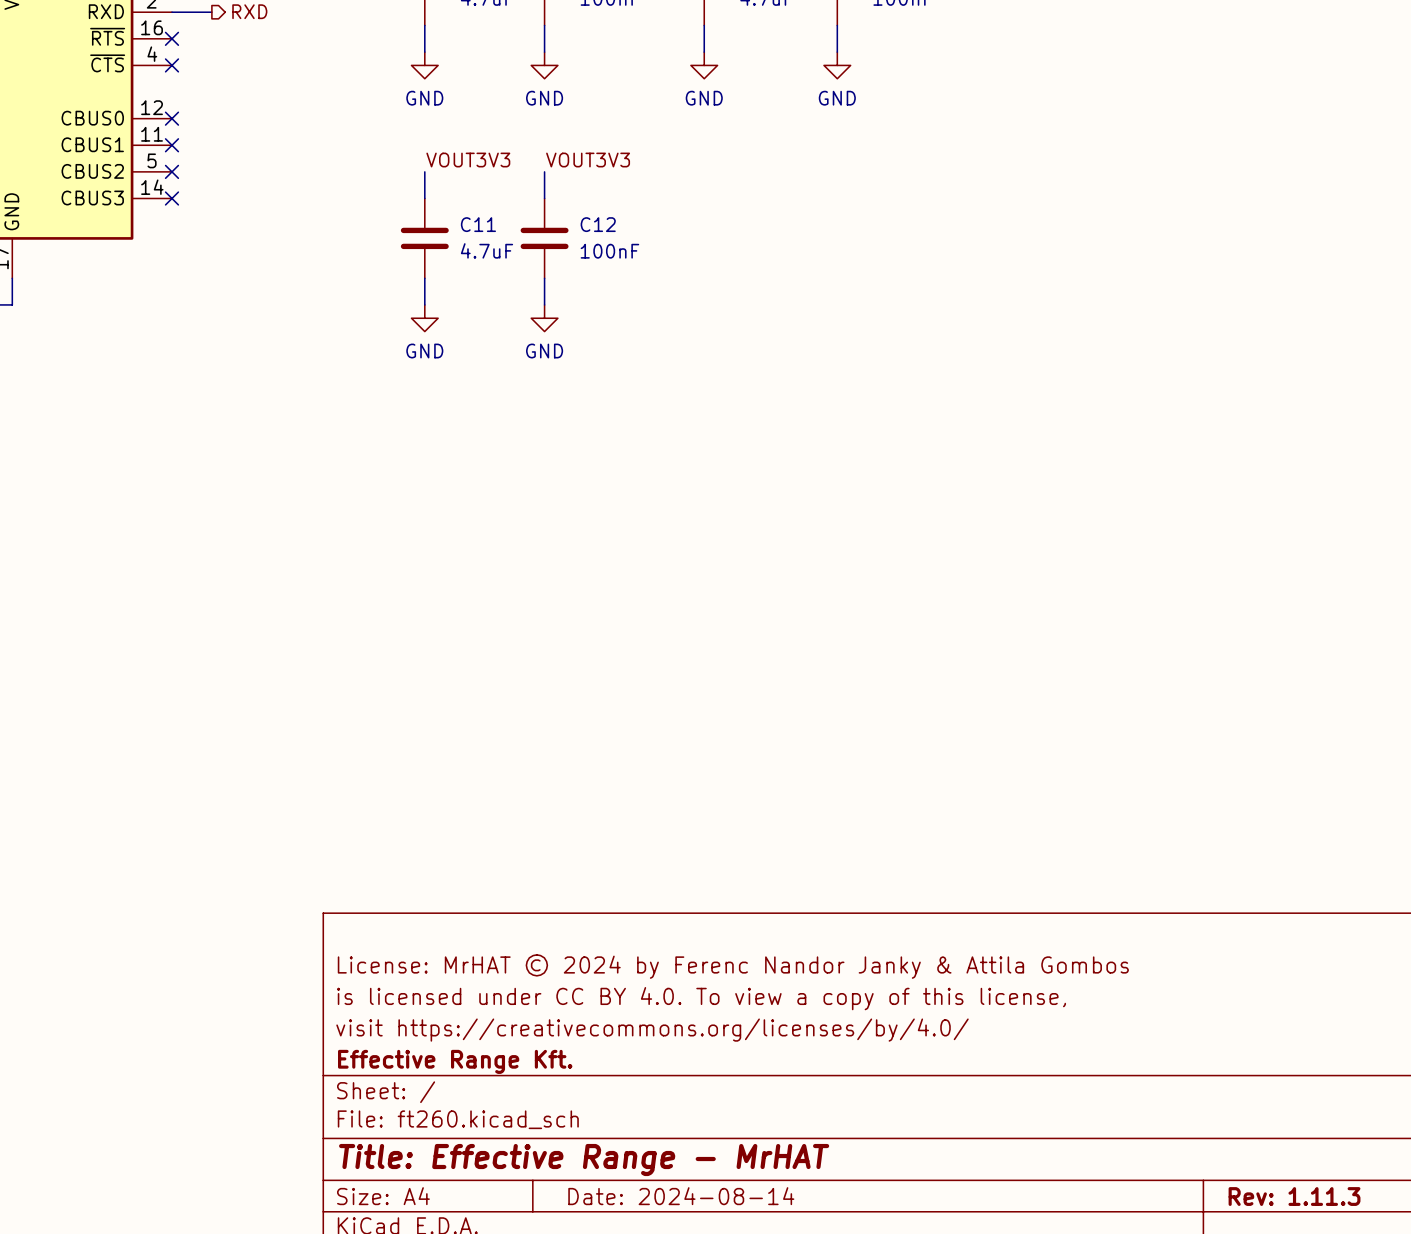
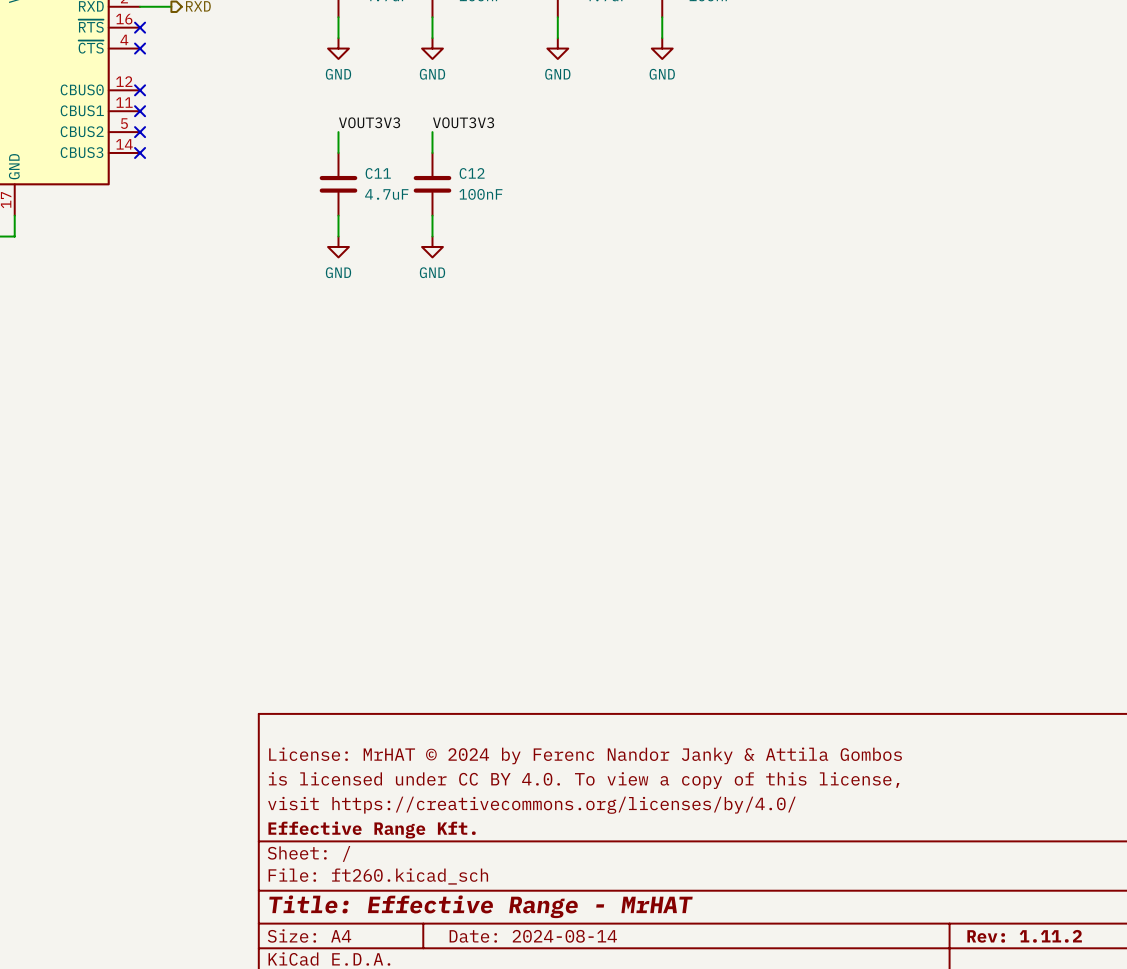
title block: Rev: 1.11.3 (1294, 1196) -> Rev: 1.11.2 (1024, 936)

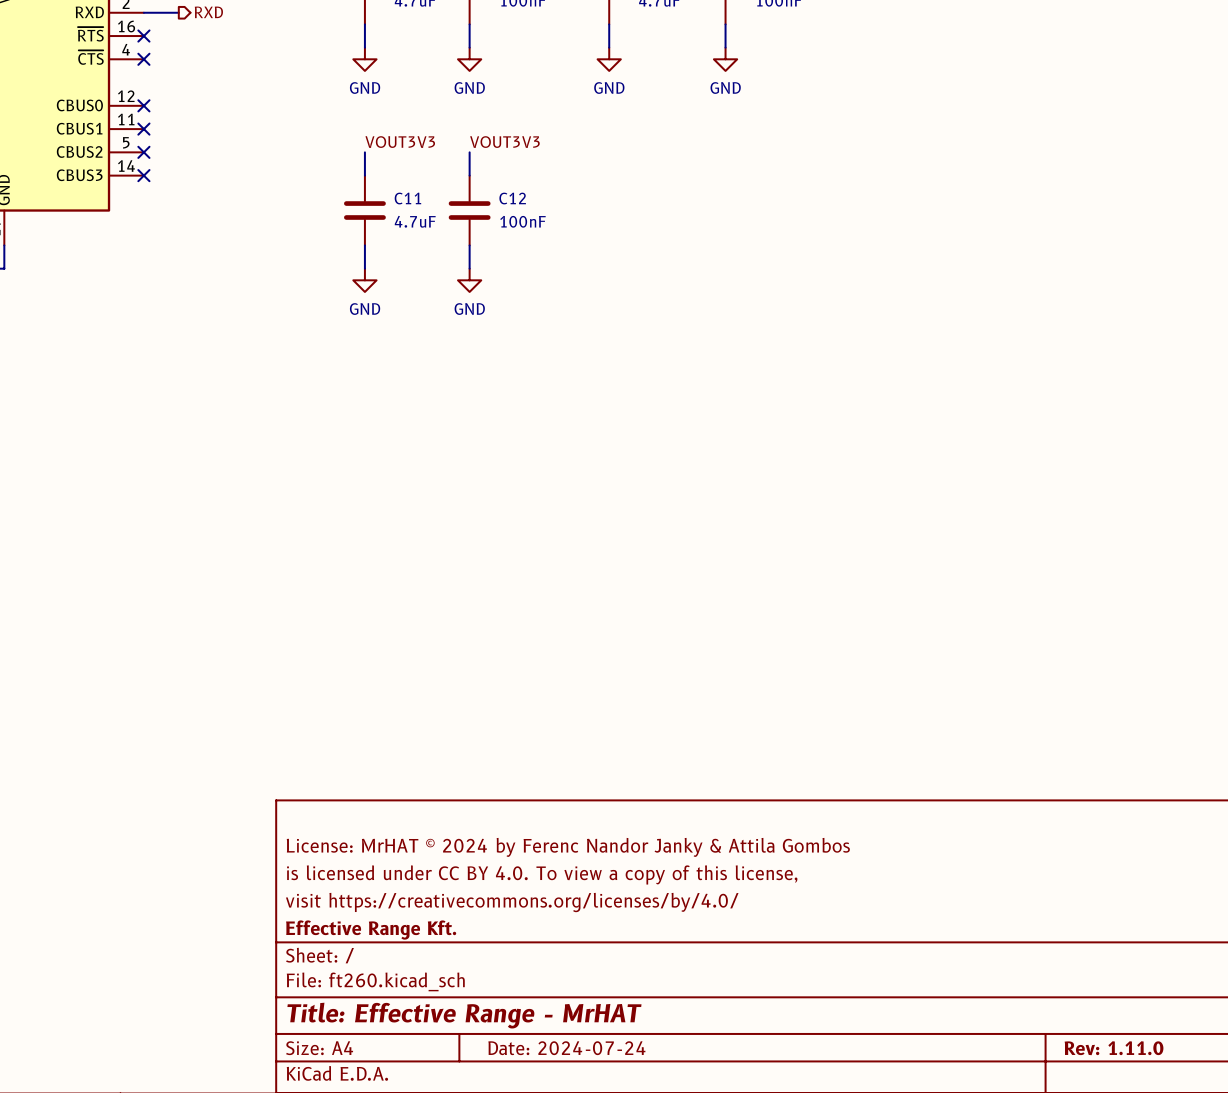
title block: Date: 2024-08-14 (533, 936) -> Date: 2024-07-24 (566, 1048)
title block: Rev: 1.11.2 (1024, 936) -> Rev: 1.11.0 (1114, 1048)

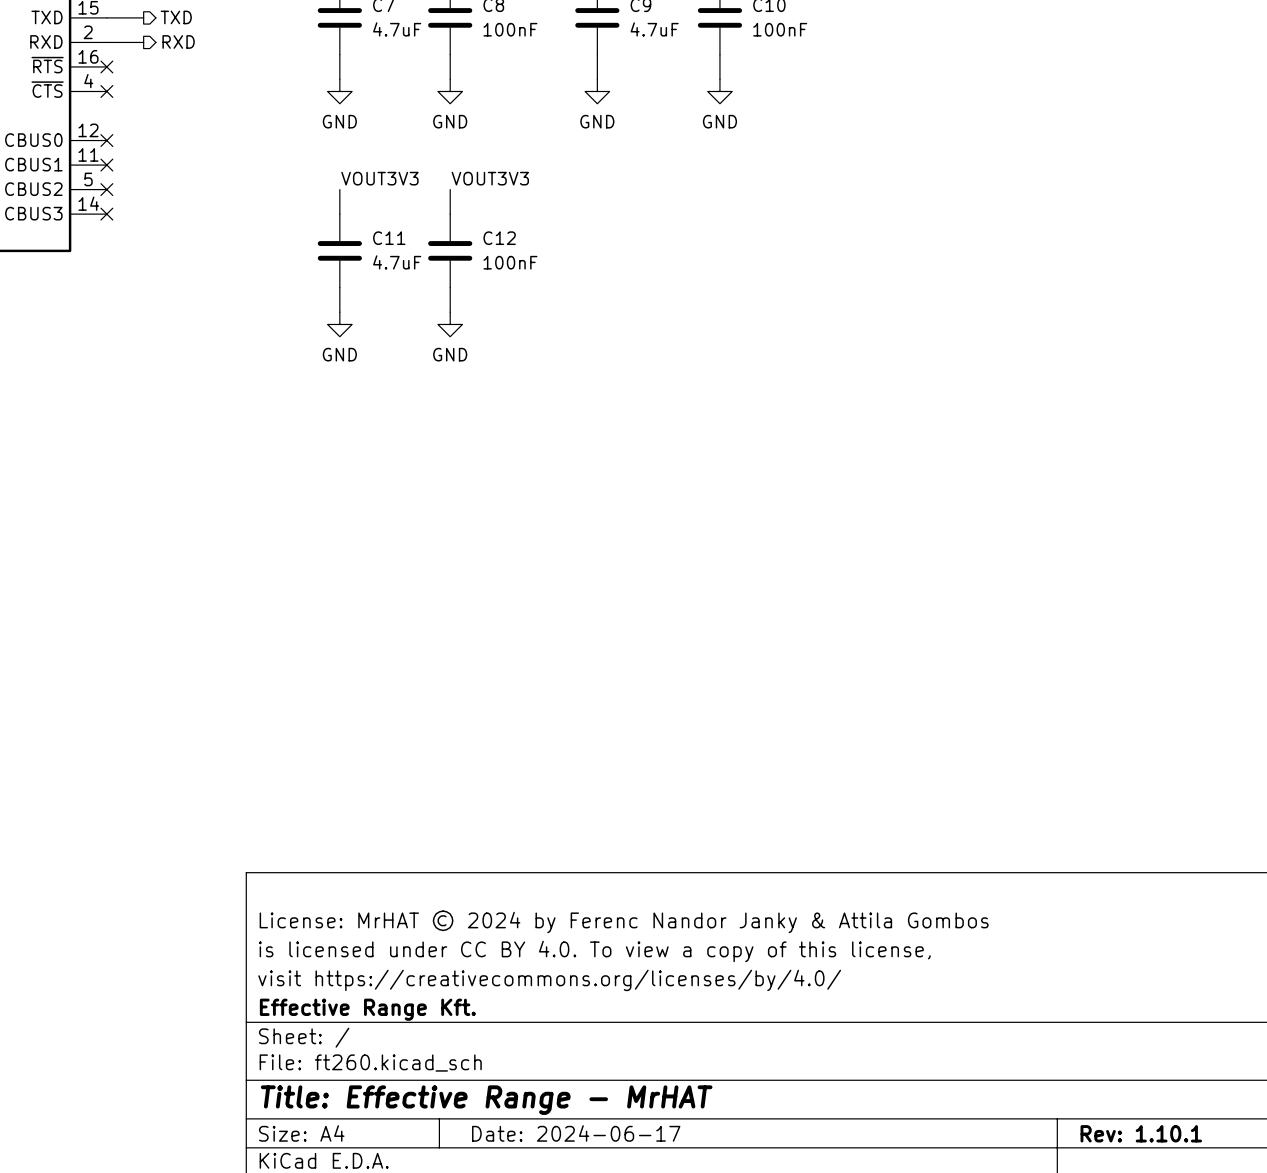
title block: Date: 2024-07-24 (566, 1048) -> Date: 2024-06-17 (576, 1133)
title block: Rev: 1.11.0 (1114, 1048) -> Rev: 1.10.1 (1141, 1133)

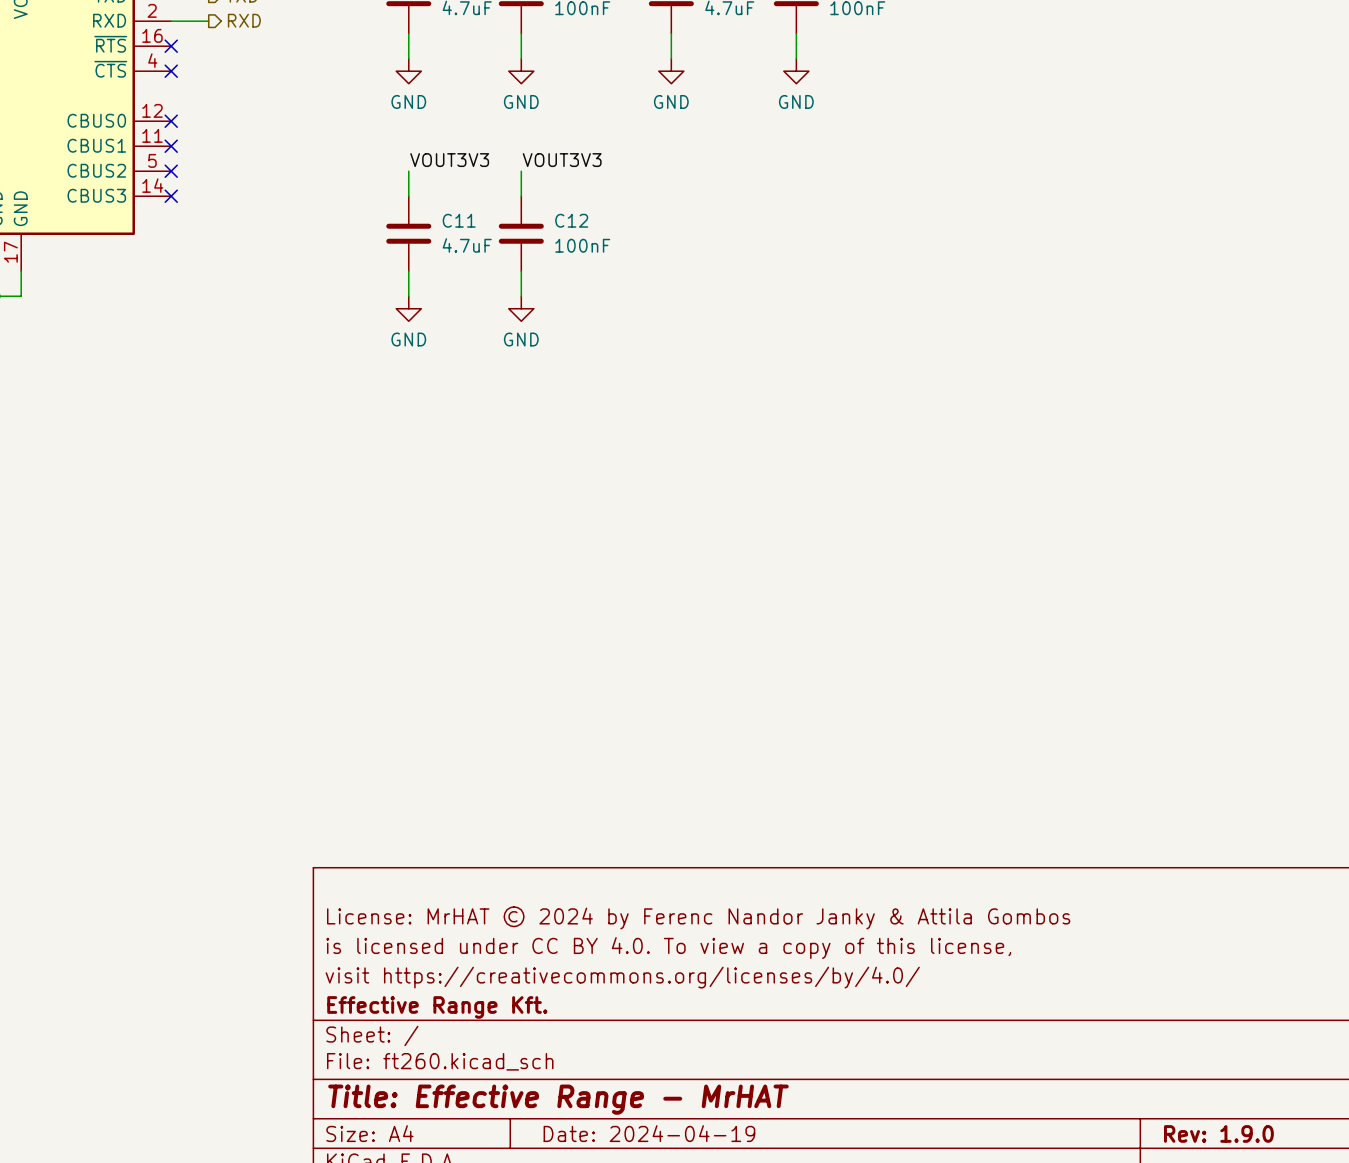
title block: Date: 2024-06-17 (576, 1133) -> Date: 2024-04-19 (649, 1133)
title block: Rev: 1.10.1 (1141, 1133) -> Rev: 1.9.0 (1218, 1133)

